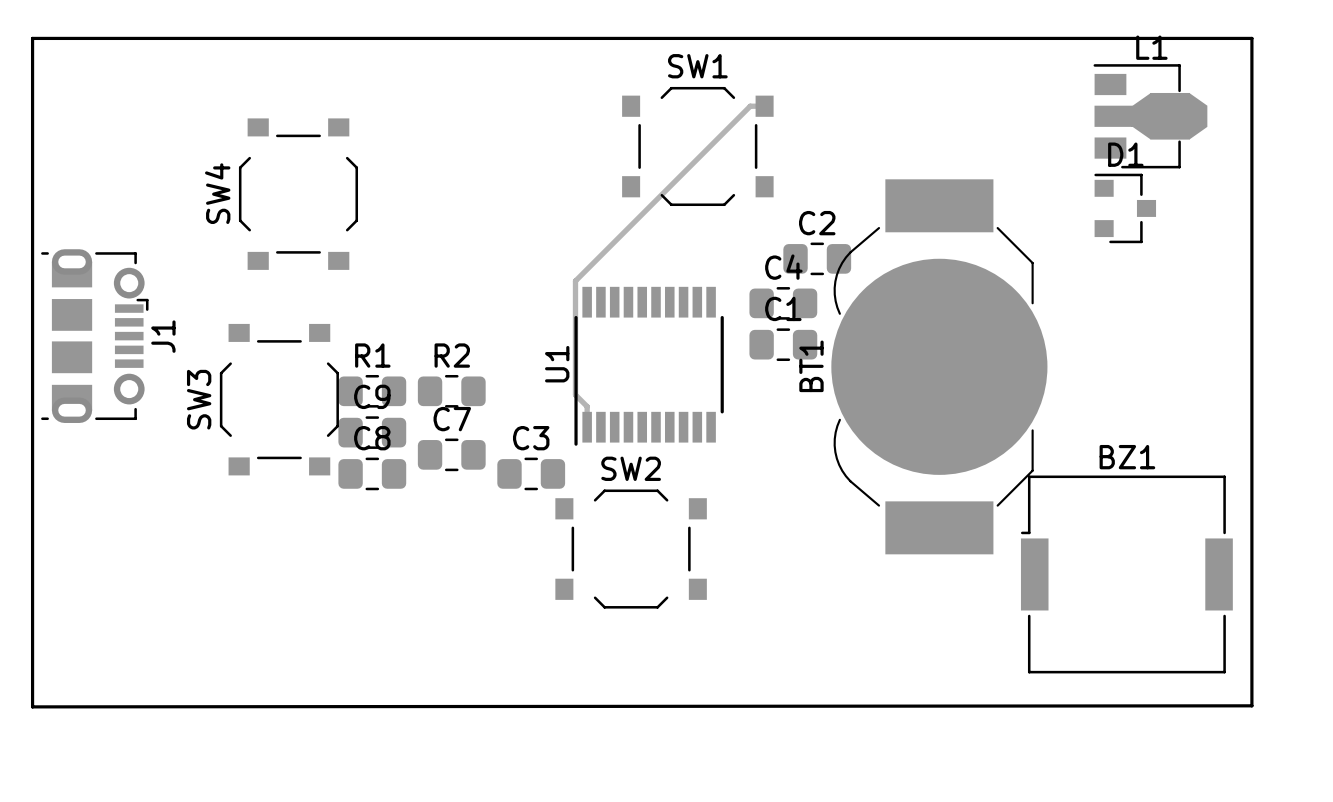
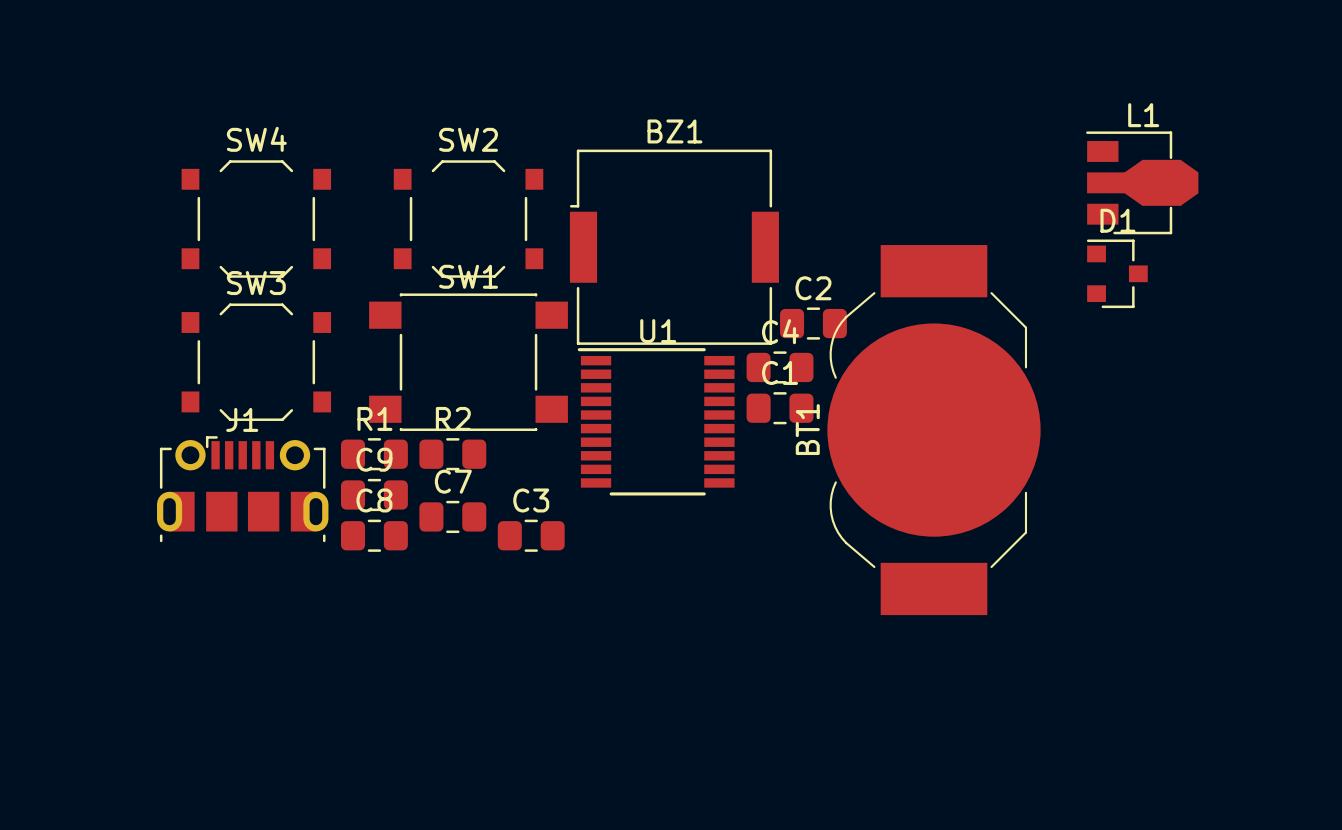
board edge: (32, 38) (1251, 38) (1251, 705) (32, 706) (32, 38) -> none
SW1 footprint: [622, 86, 774, 207] -> [369, 293, 568, 432]
track: (764, 106) (750, 106) (575, 281) (575, 394) (587, 406) (587, 427) -> none
SW4 rotation: 0° (298, 194) -> 90° clockwise (256, 219)
J1 rotation: 0° (94, 336) -> 90° counterclockwise (242, 489)
J1 position: (94, 336) -> (242, 489)
U1 rotation: 0° (649, 366) -> 90° clockwise (656, 421)
SW3 rotation: 0° (279, 399) -> 90° clockwise (256, 362)
SW3 position: (279, 399) -> (256, 362)
SW2 position: (631, 549) -> (468, 219)
BZ1 position: (1126, 574) -> (674, 247)

